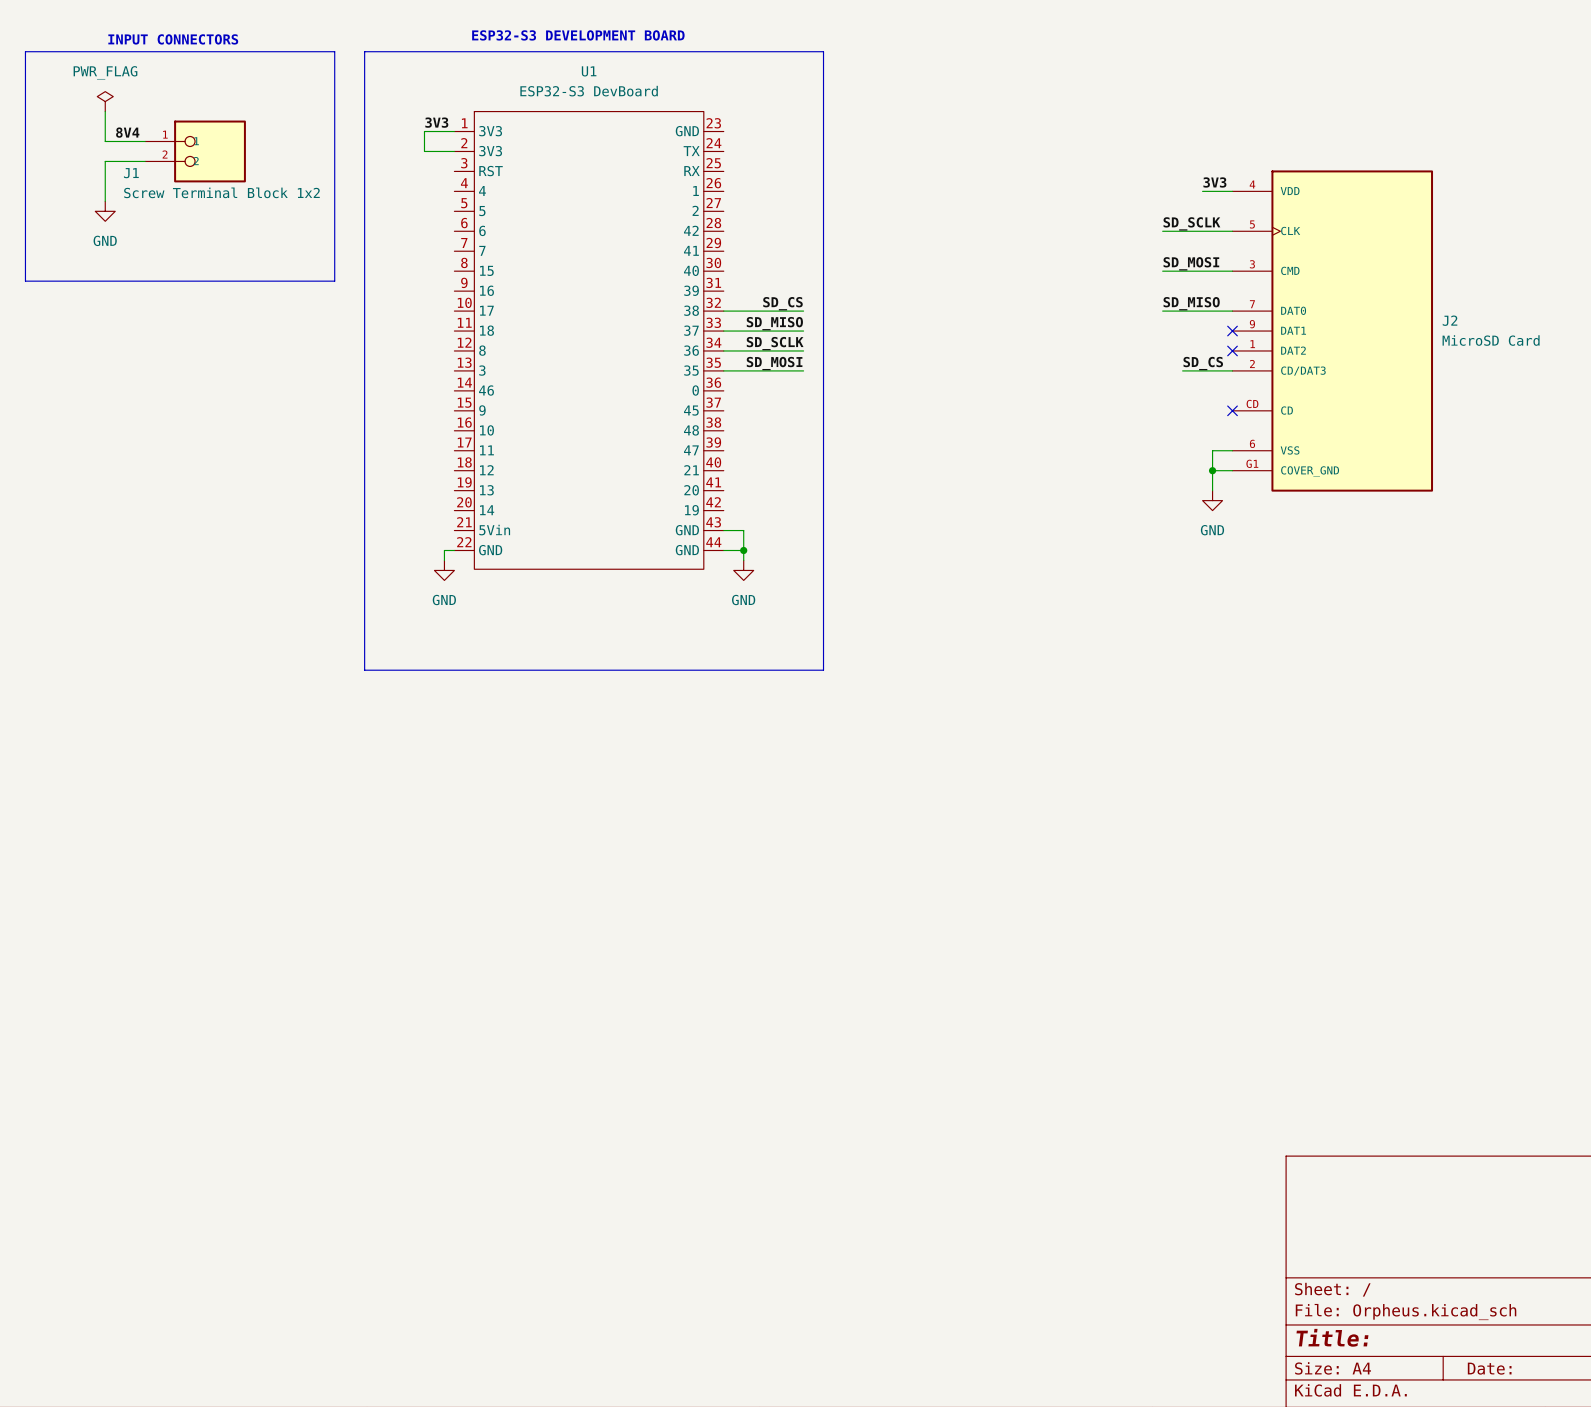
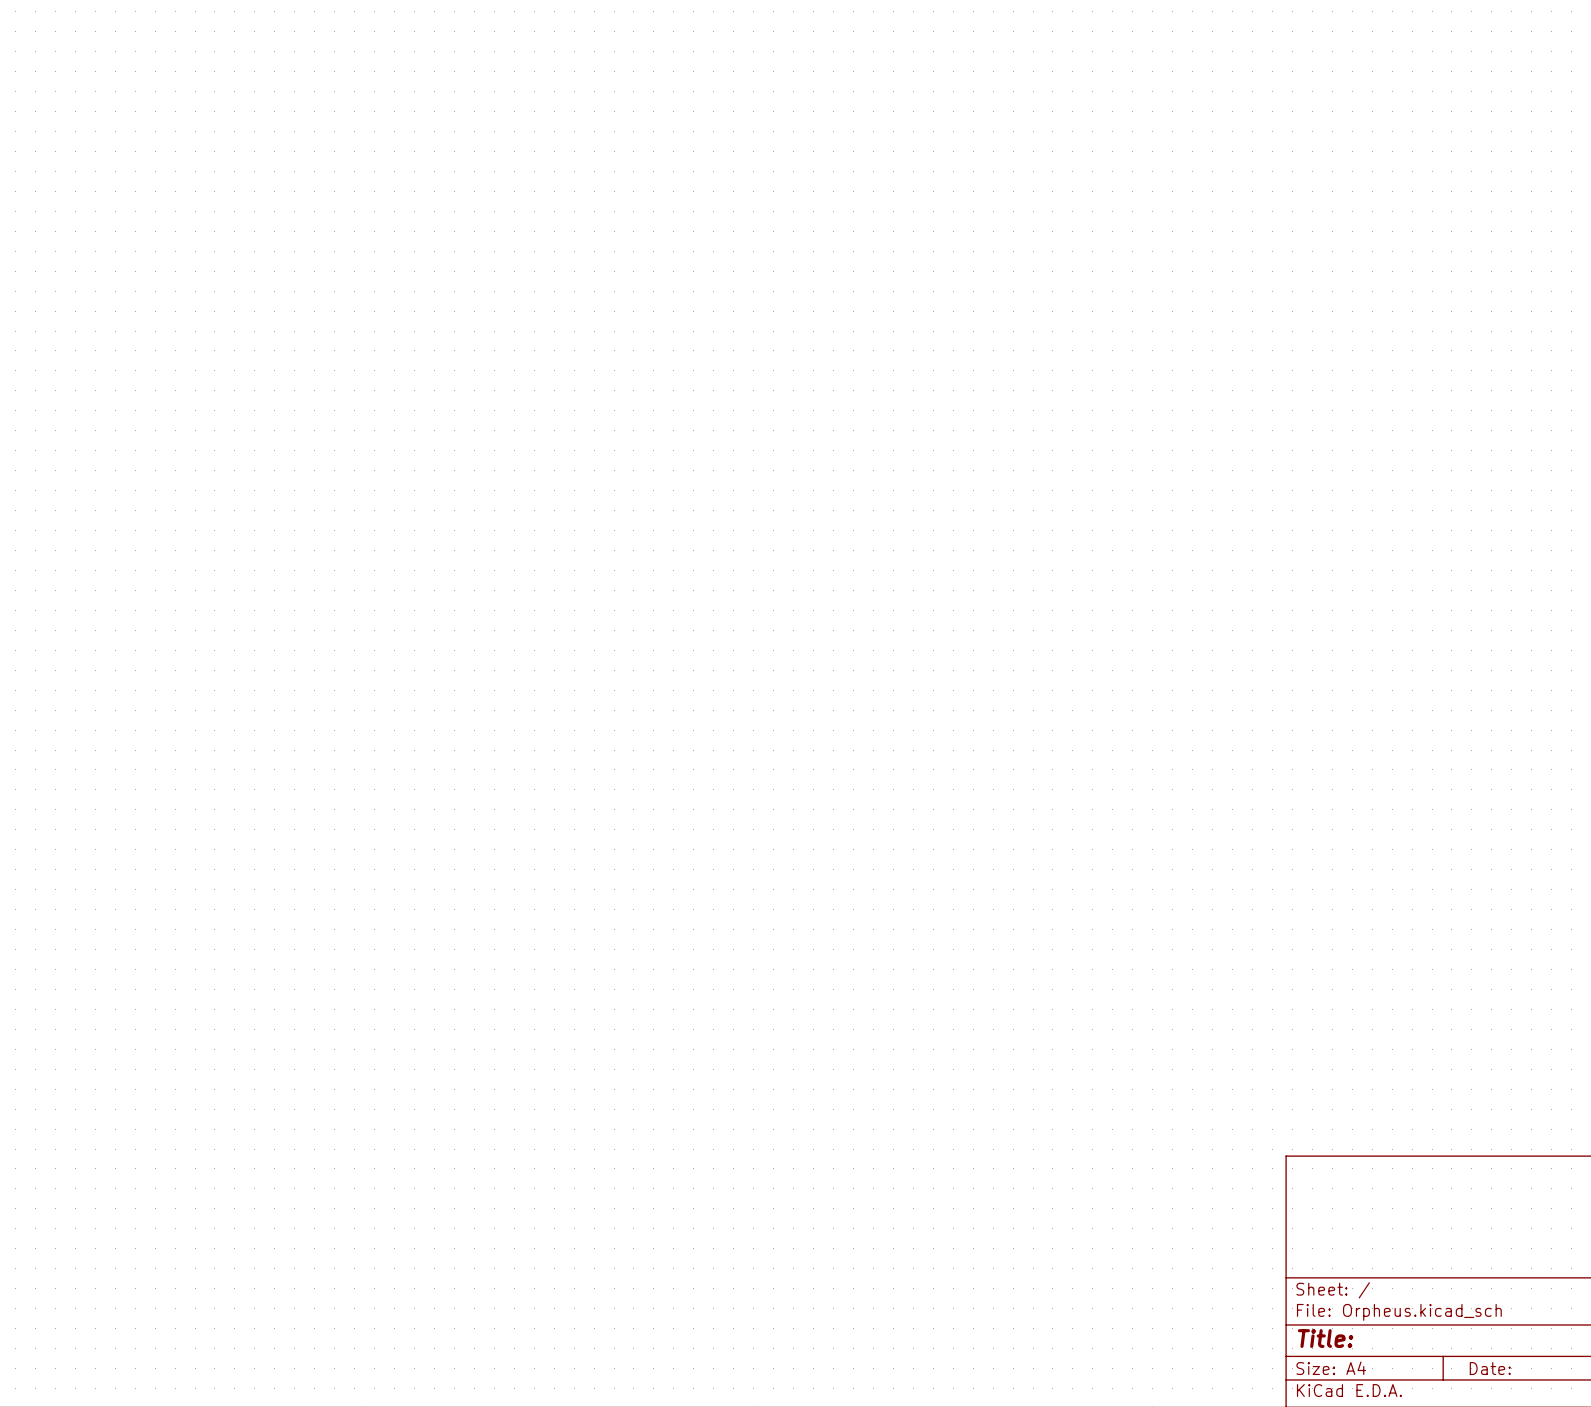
text: ESP32-S3 DEVELOPMENT BOARD (578, 35) -> none
text: INPUT CONNECTORS (173, 39) -> none
line: (25, 51) (334, 51) (334, 281) (25, 281) (25, 51) -> none
line: (364, 51) (823, 51) (823, 670) (364, 670) (364, 51) -> none
power symbol: PWR_FLAG (105, 101) -> none
wire: (105, 111) (105, 141) (145, 141) -> none
label: 3V3 (436, 122) -> none
wire: (454, 131) (424, 131) (424, 151) (454, 151) -> none
label: 8V4 (127, 132) -> none
J1: Screw Terminal Block 1x2 (195, 151) -> none
wire: (145, 161) (105, 161) (105, 201) -> none
label: 3V3 (1214, 182) -> none
wire: (1202, 191) (1232, 191) -> none
power symbol: GND (105, 211) -> none
label: SD_SCLK (1191, 223) -> none
wire: (1162, 231) (1232, 231) -> none
label: SD_MOSI (1191, 263) -> none
wire: (1162, 271) (1232, 271) -> none
label: SD_CS (782, 303) -> none
label: SD_MISO (1191, 303) -> none
wire: (723, 311) (803, 311) -> none
wire: (1162, 311) (1232, 311) -> none
label: SD_MISO (774, 323) -> none
wire: (723, 331) (803, 331) -> none
no-connect mark: (1232, 331) -> none
J2: MicroSD Card (1332, 331) -> none
U1: ESP32-S3 DevBoard (589, 340) -> none
label: SD_SCLK (775, 343) -> none
wire: (723, 350) (803, 350) -> none
no-connect mark: (1232, 350) -> none
label: SD_MOSI (774, 363) -> none
label: SD_CS (1203, 363) -> none
wire: (723, 370) (803, 370) -> none
wire: (1182, 370) (1232, 370) -> none
no-connect mark: (1232, 410) -> none
wire: (1232, 450) (1212, 450) (1212, 490) -> none
wire: (1212, 470) (1232, 470) -> none
junction: (1212, 470) -> none
power symbol: GND (1212, 500) -> none
wire: (723, 530) (743, 530) (743, 560) -> none
wire: (454, 550) (444, 550) (444, 560) -> none
wire: (723, 550) (743, 550) -> none
junction: (743, 550) -> none
power symbol: GND (444, 570) -> none
power symbol: GND (743, 570) -> none

